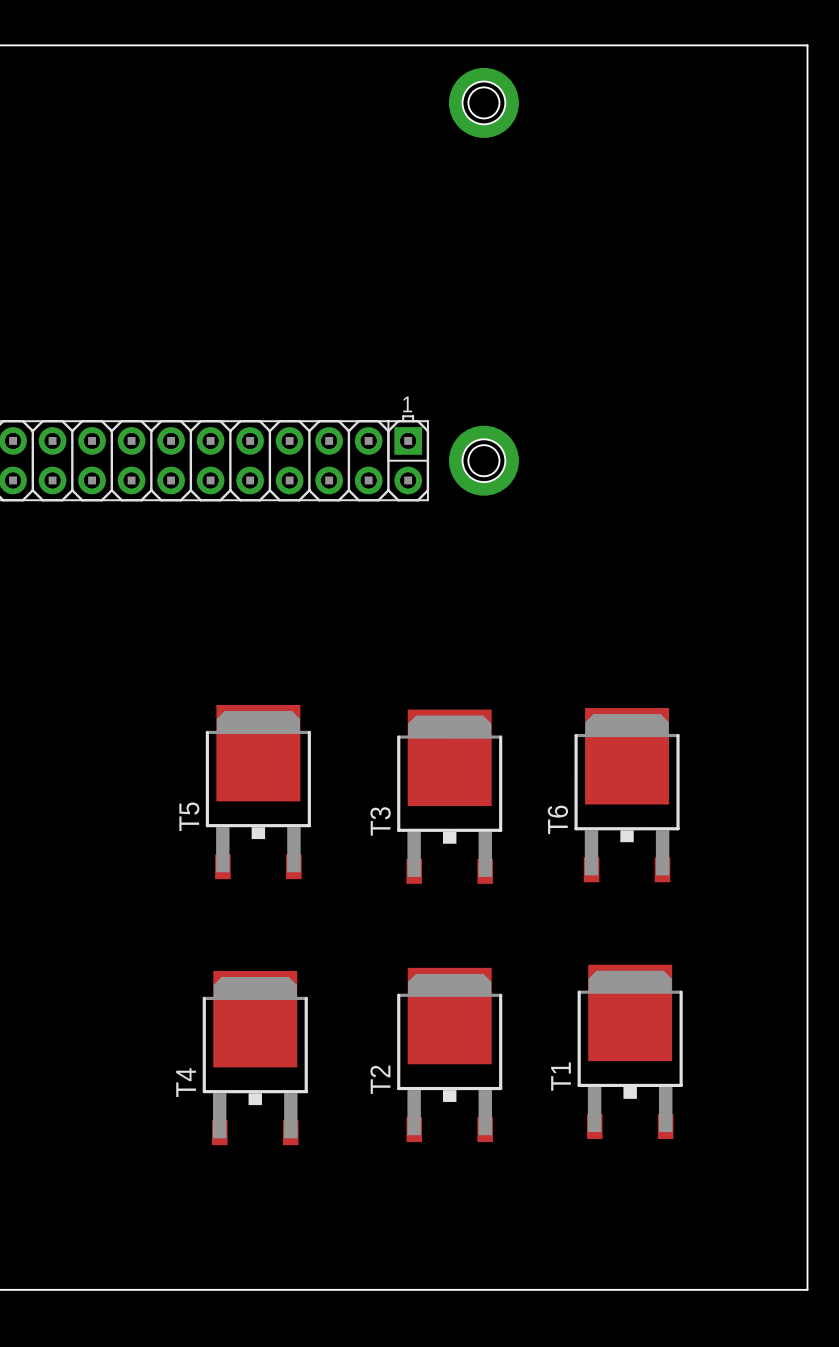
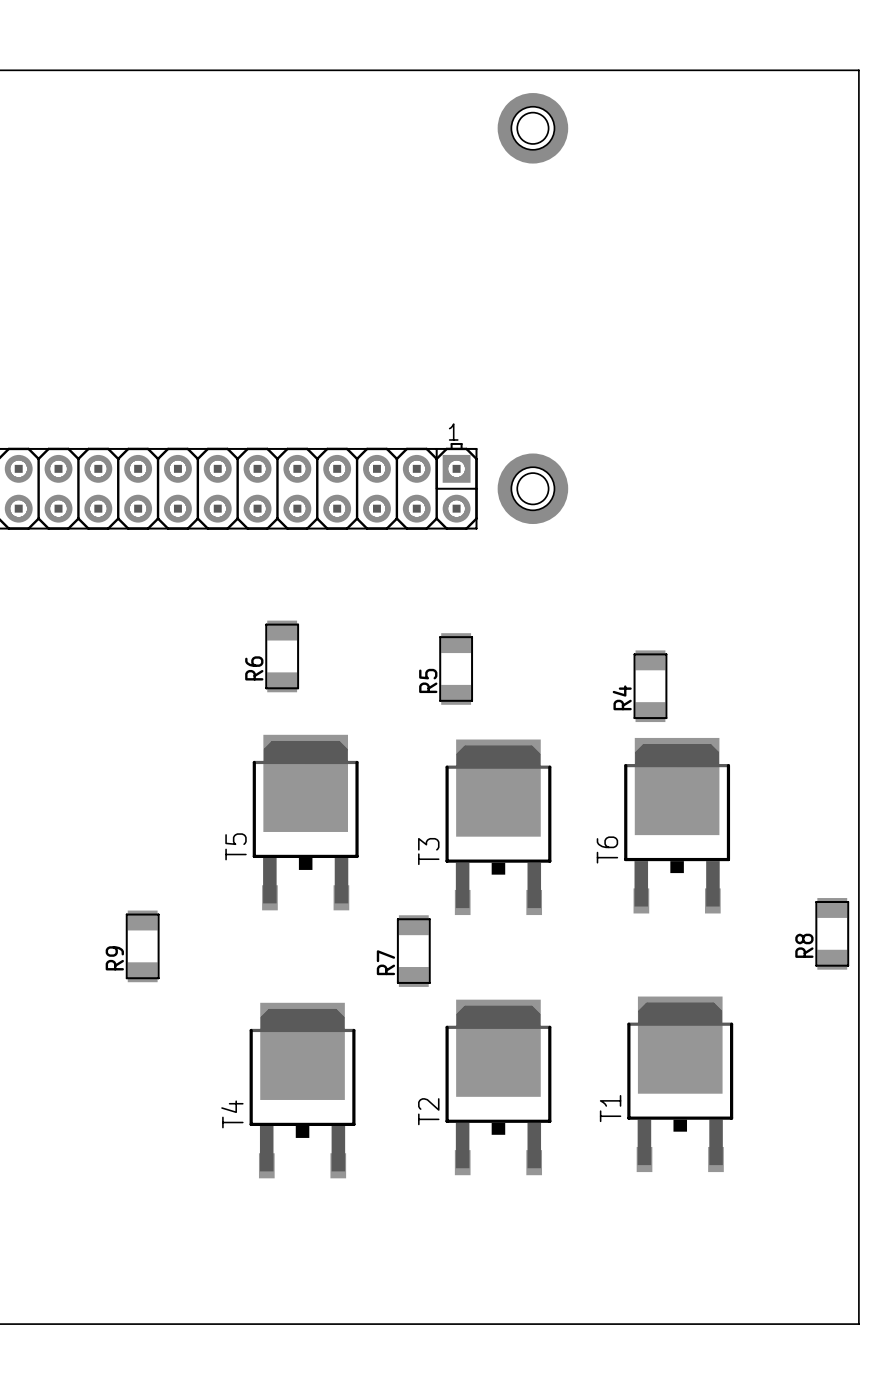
R6: none -> (282, 656)
R5: none -> (456, 668)
R4: none -> (650, 686)
R8: none -> (832, 933)
R9: none -> (142, 946)
R7: none -> (413, 951)

